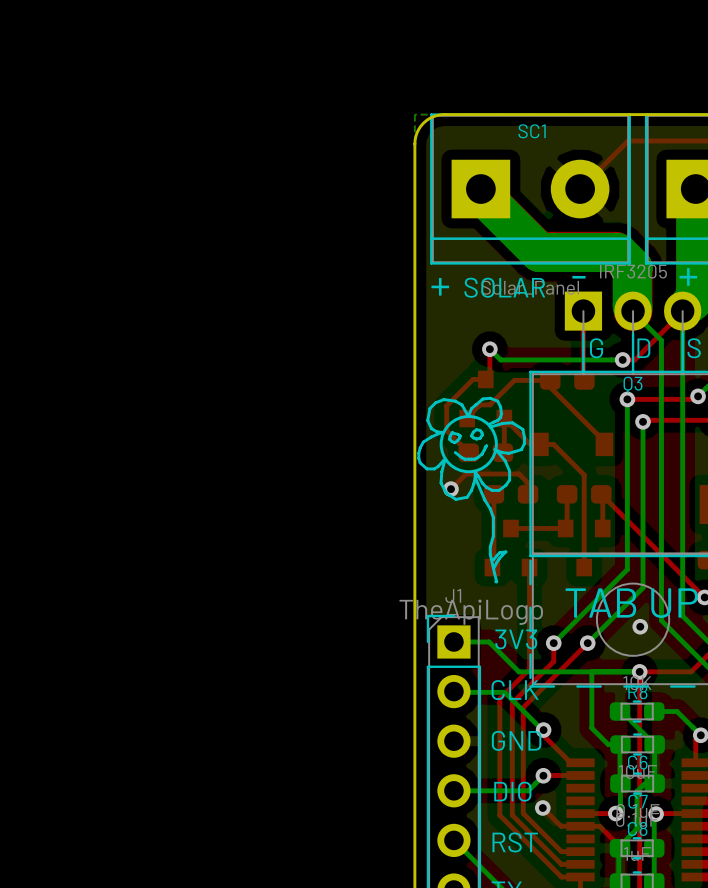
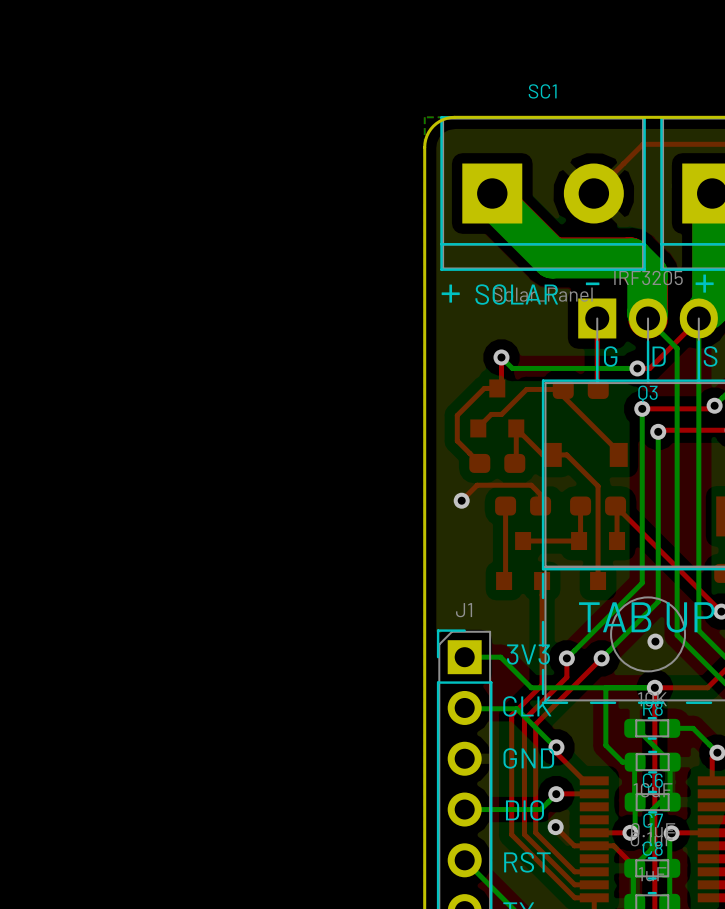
SC1 name position: SC1 (532, 131) -> SC1 (542, 91)
drawing: [417, 396, 526, 584] -> none

